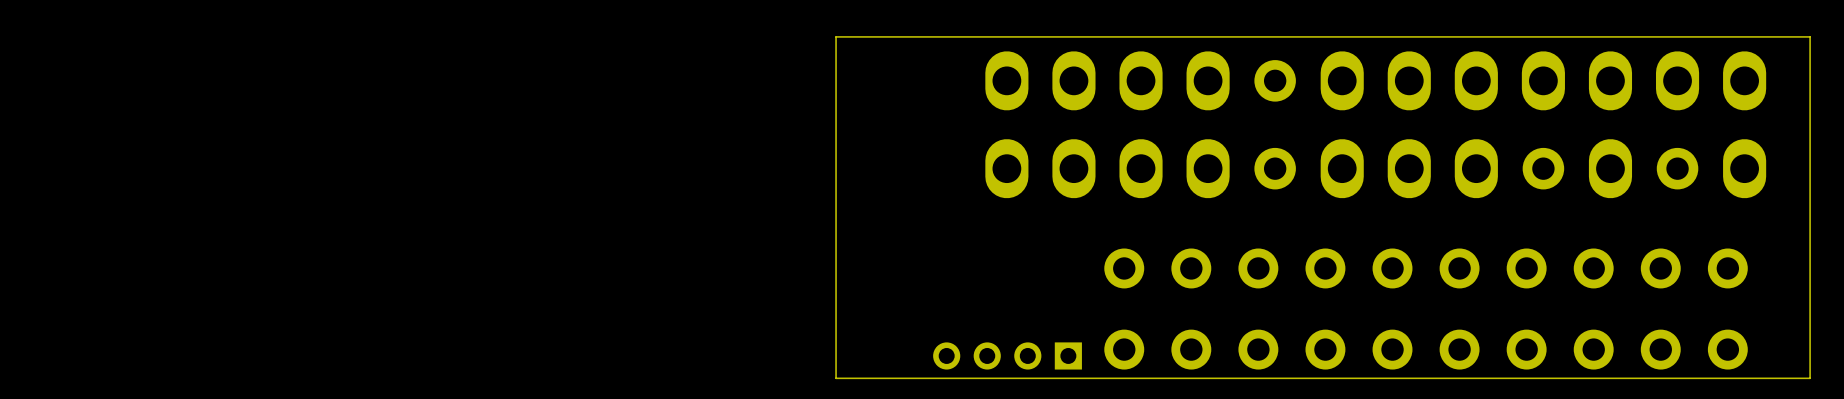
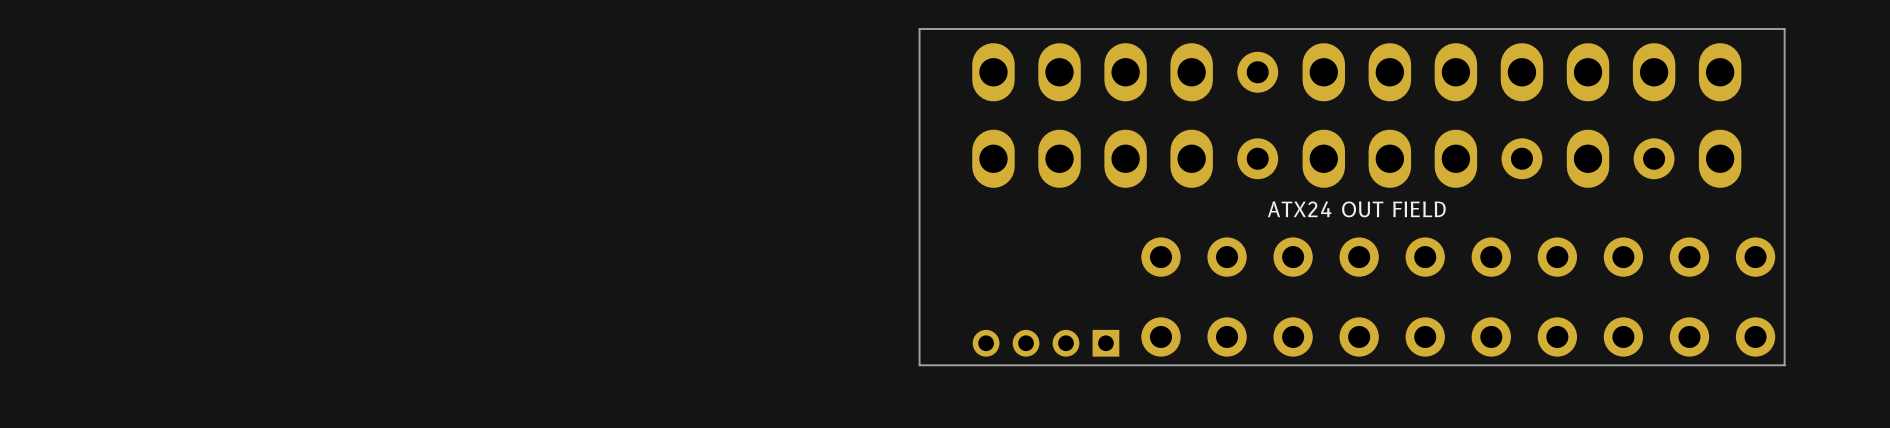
board edge: (879, 36) (836, 36) (836, 378) (879, 378) -> (919, 29) (919, 365)
board edge: (1757, 36) (1810, 36) (1810, 378) (1757, 378) -> (1784, 29) (1784, 365)
part: none -> ATX24 OUT FIELD (1356, 115)
part: (1375, 124) -> none

